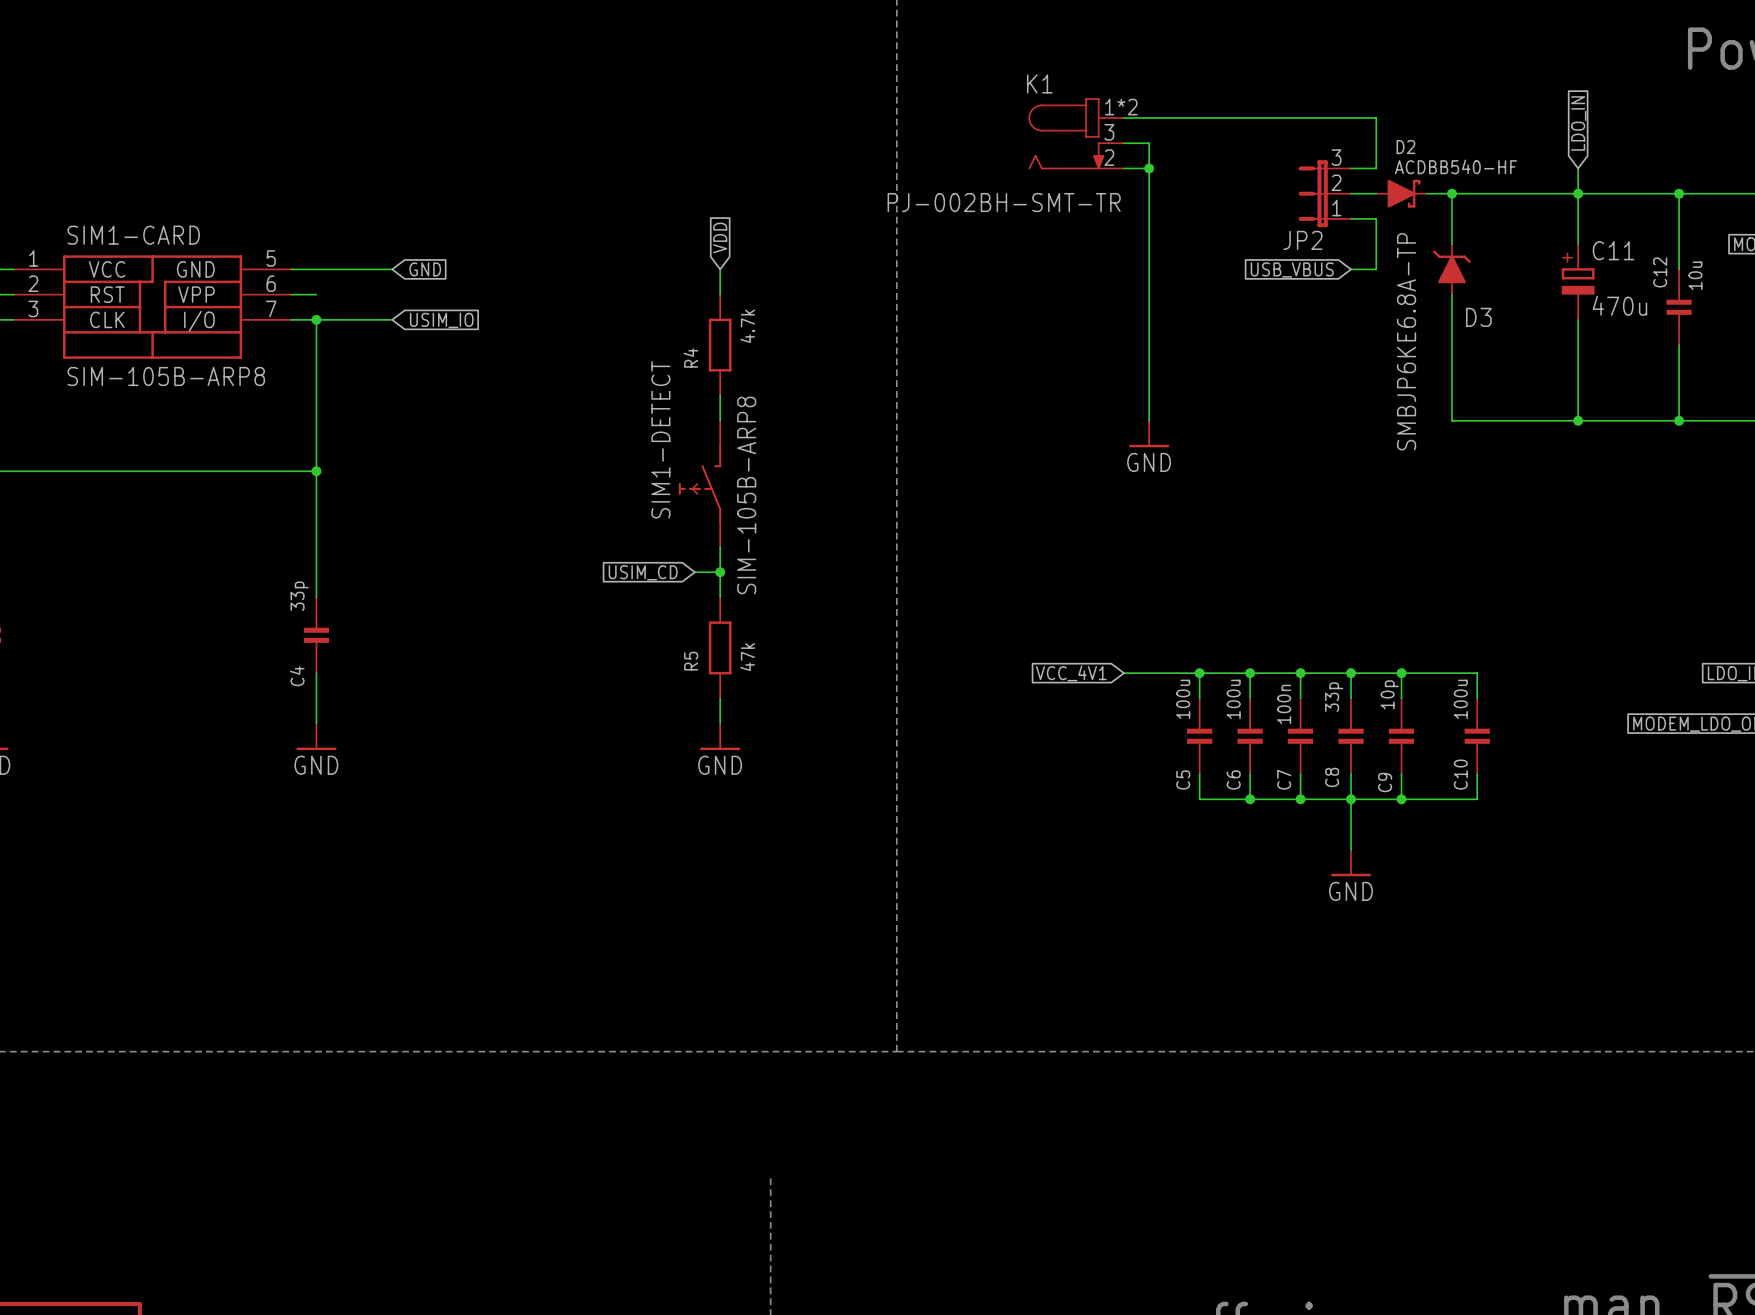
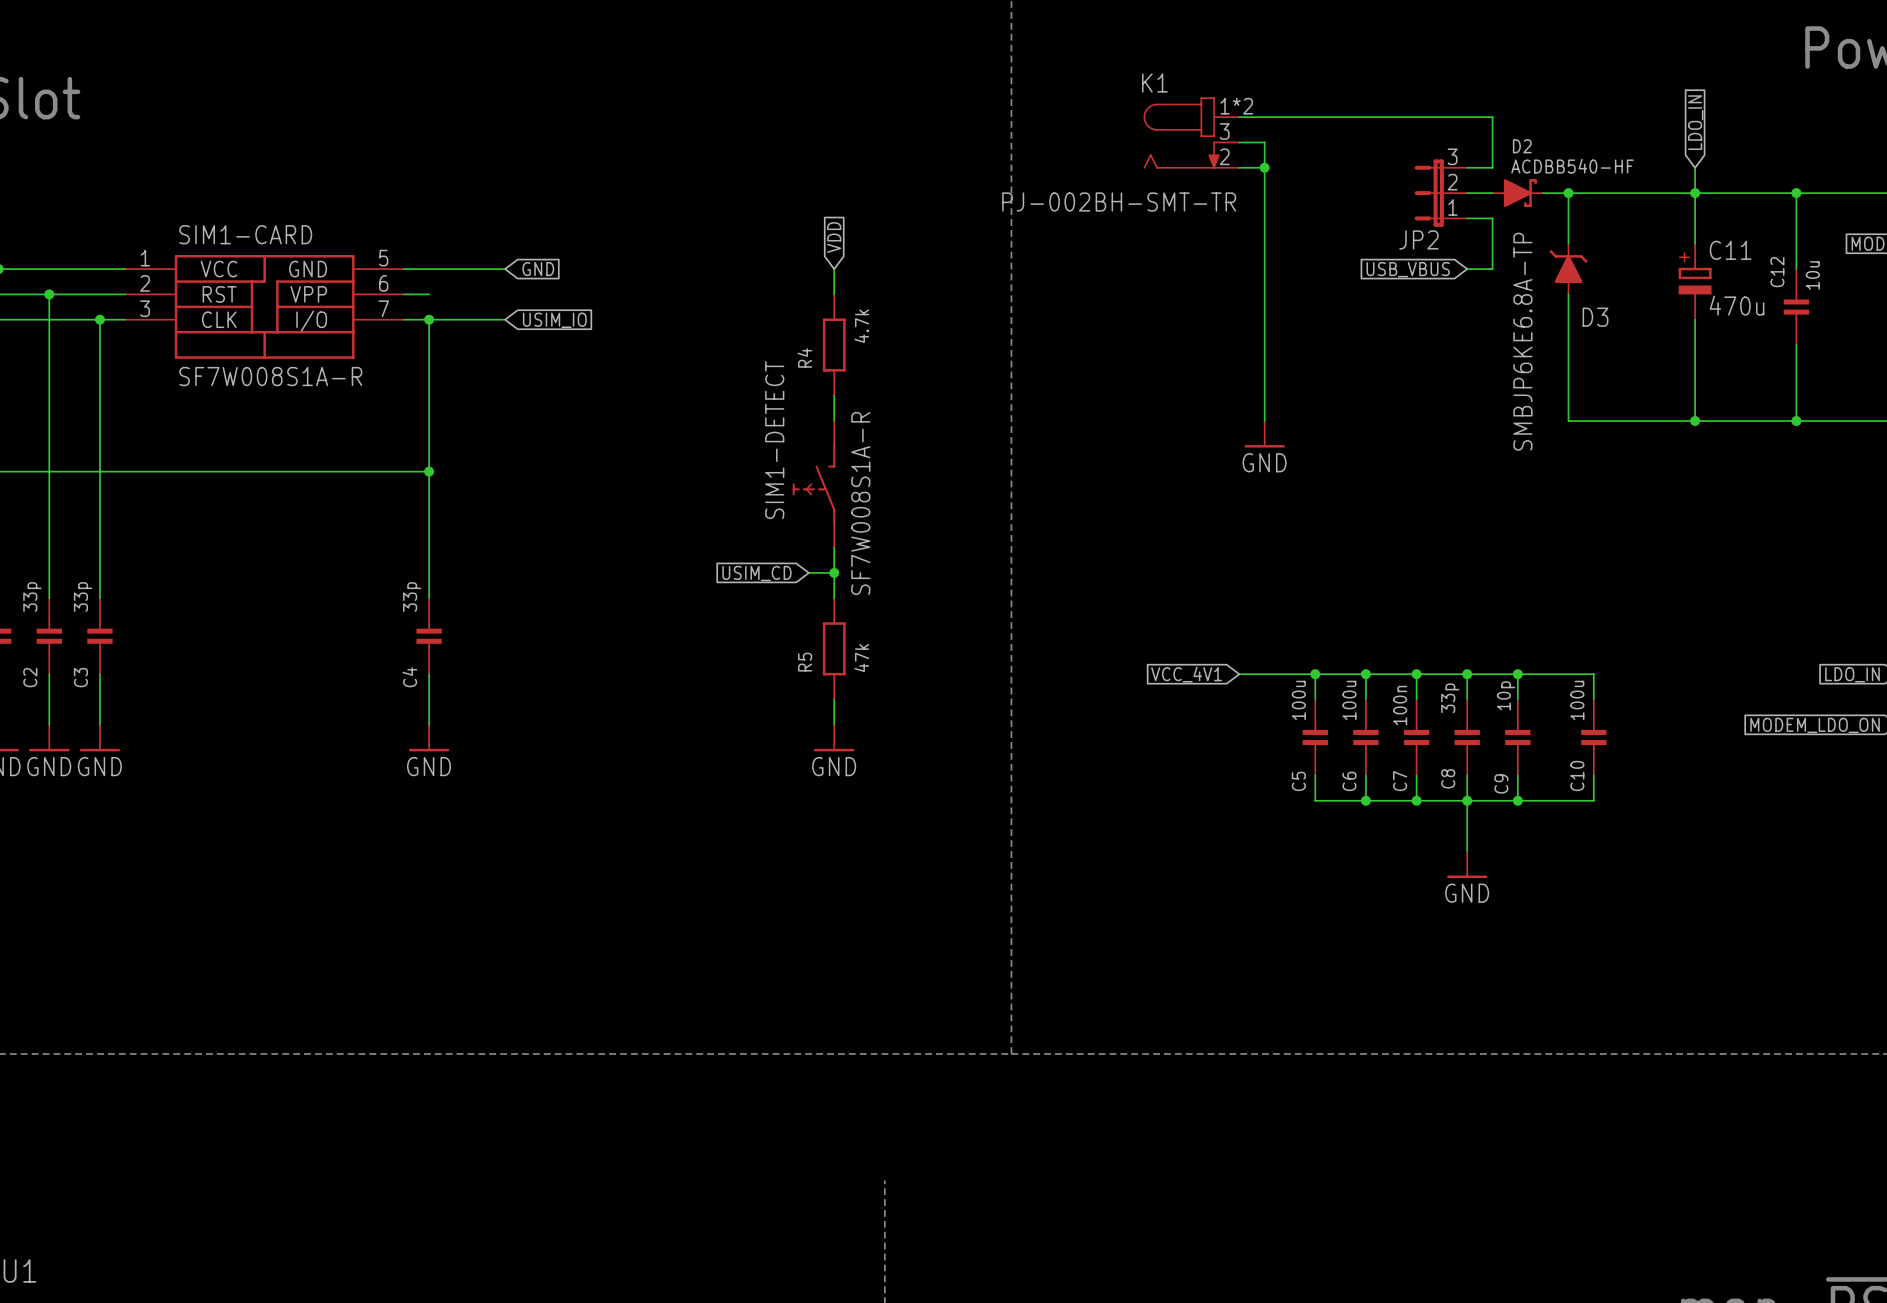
SIM1-CARD value: SIM-105B-ARP8 (166, 376) -> SF7W008S1A-R (270, 376)
SIM1-DETECT value: SIM-105B-ARP8 (746, 495) -> SF7W008S1A-R (860, 503)

